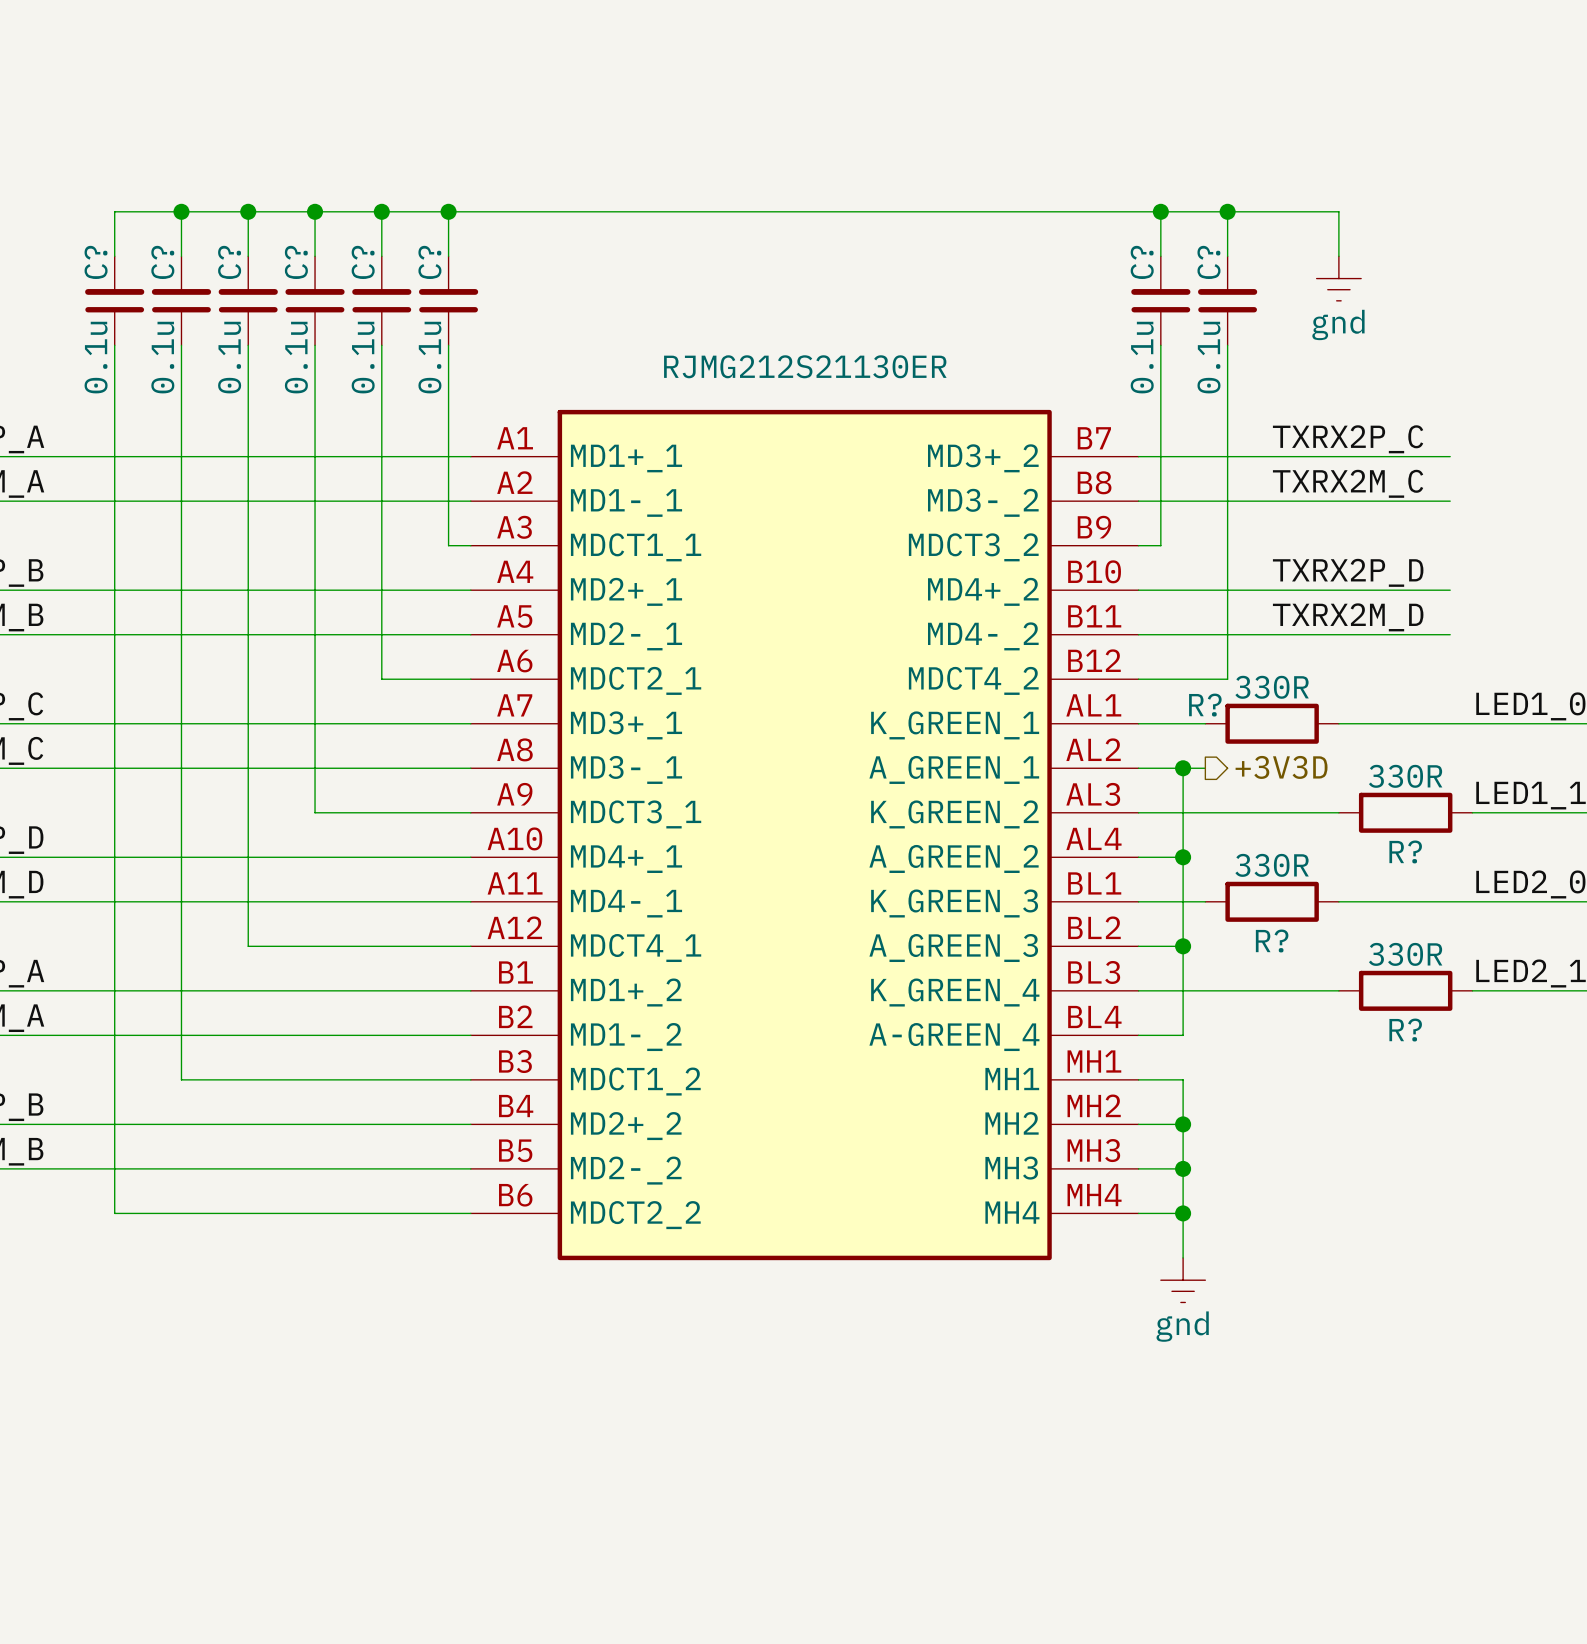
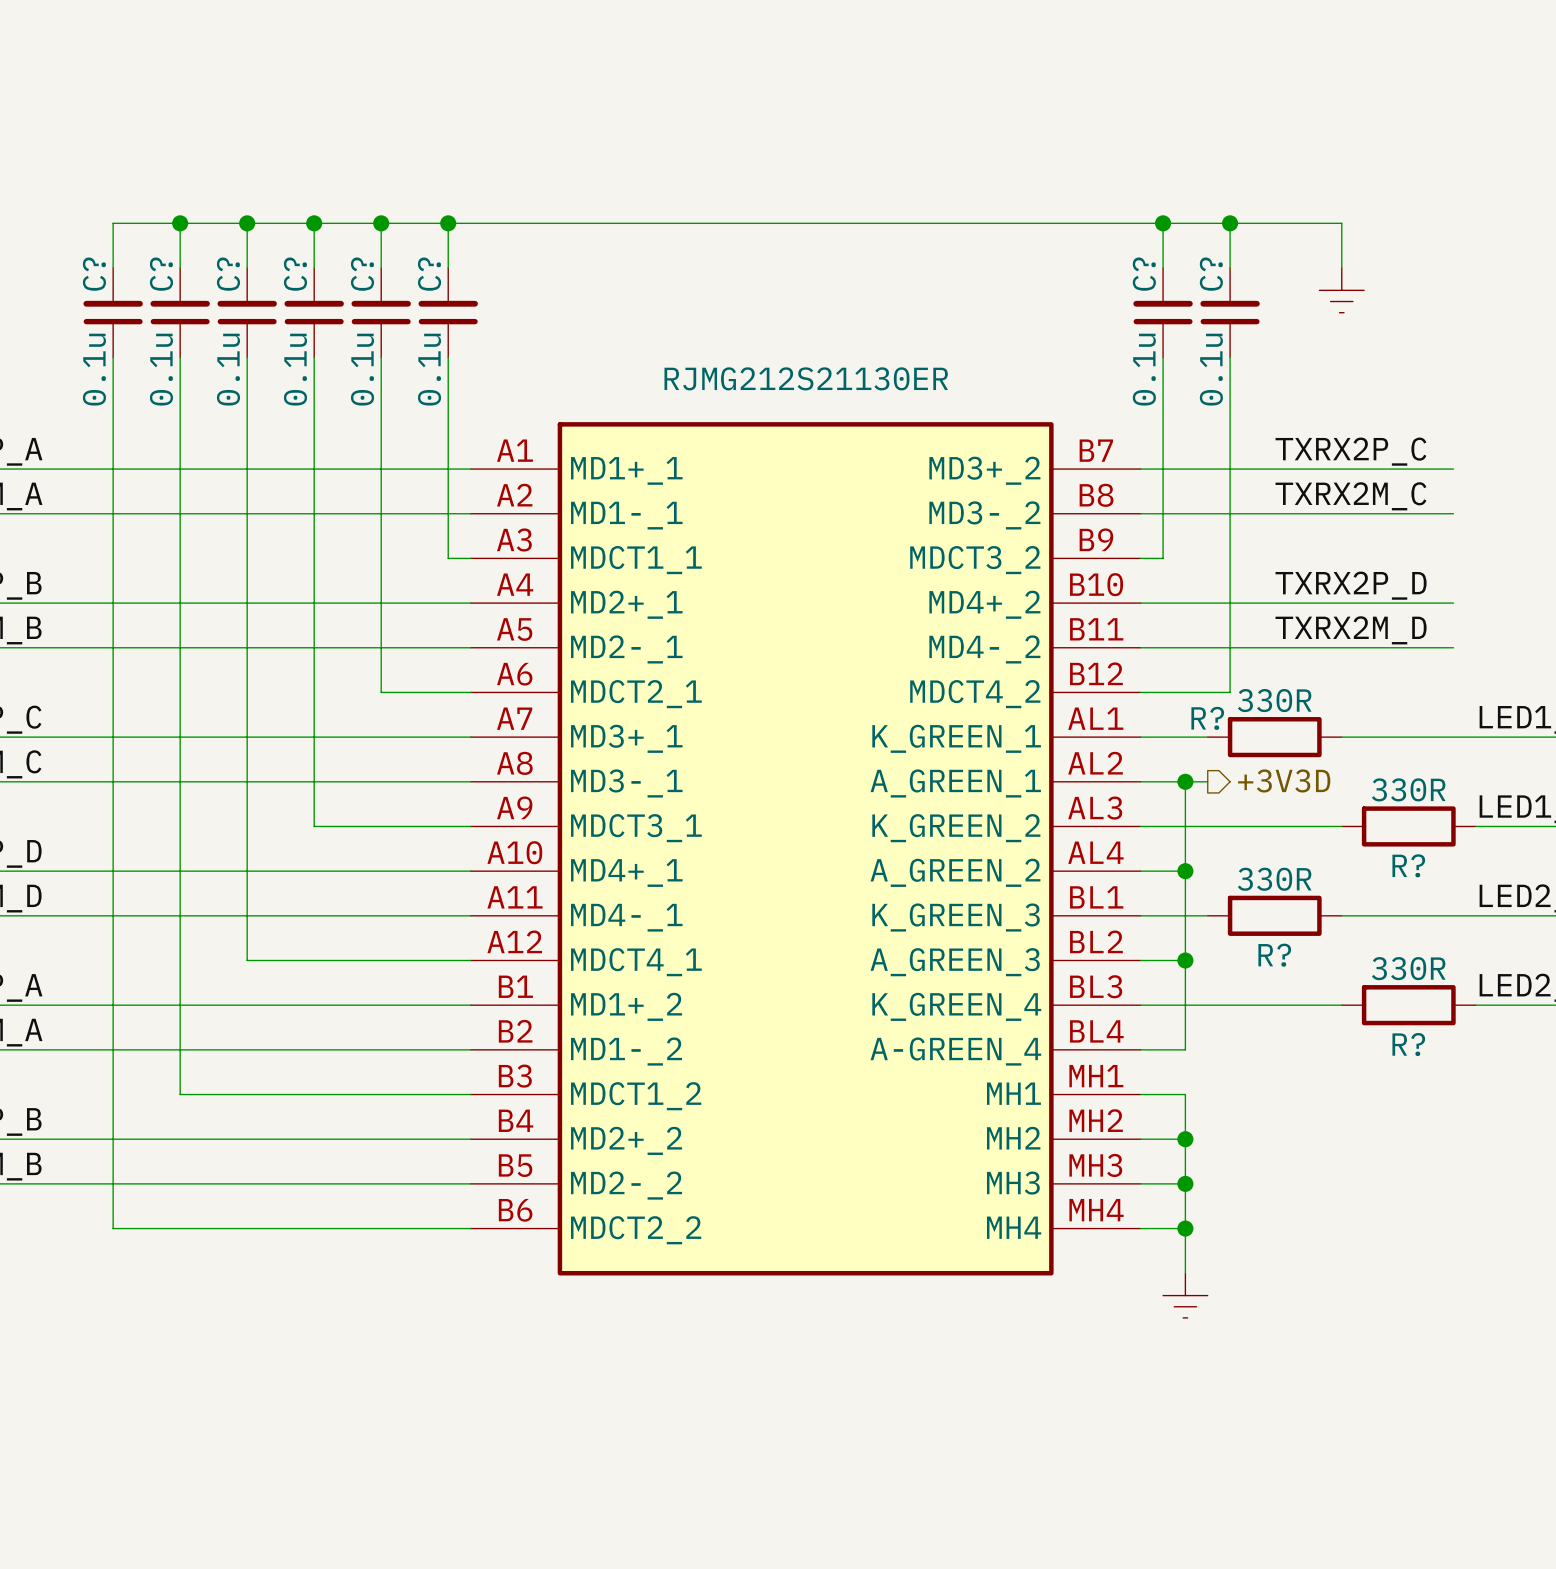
power symbol text: gnd (1338, 324) -> none
power symbol text: gnd (1182, 1326) -> none

